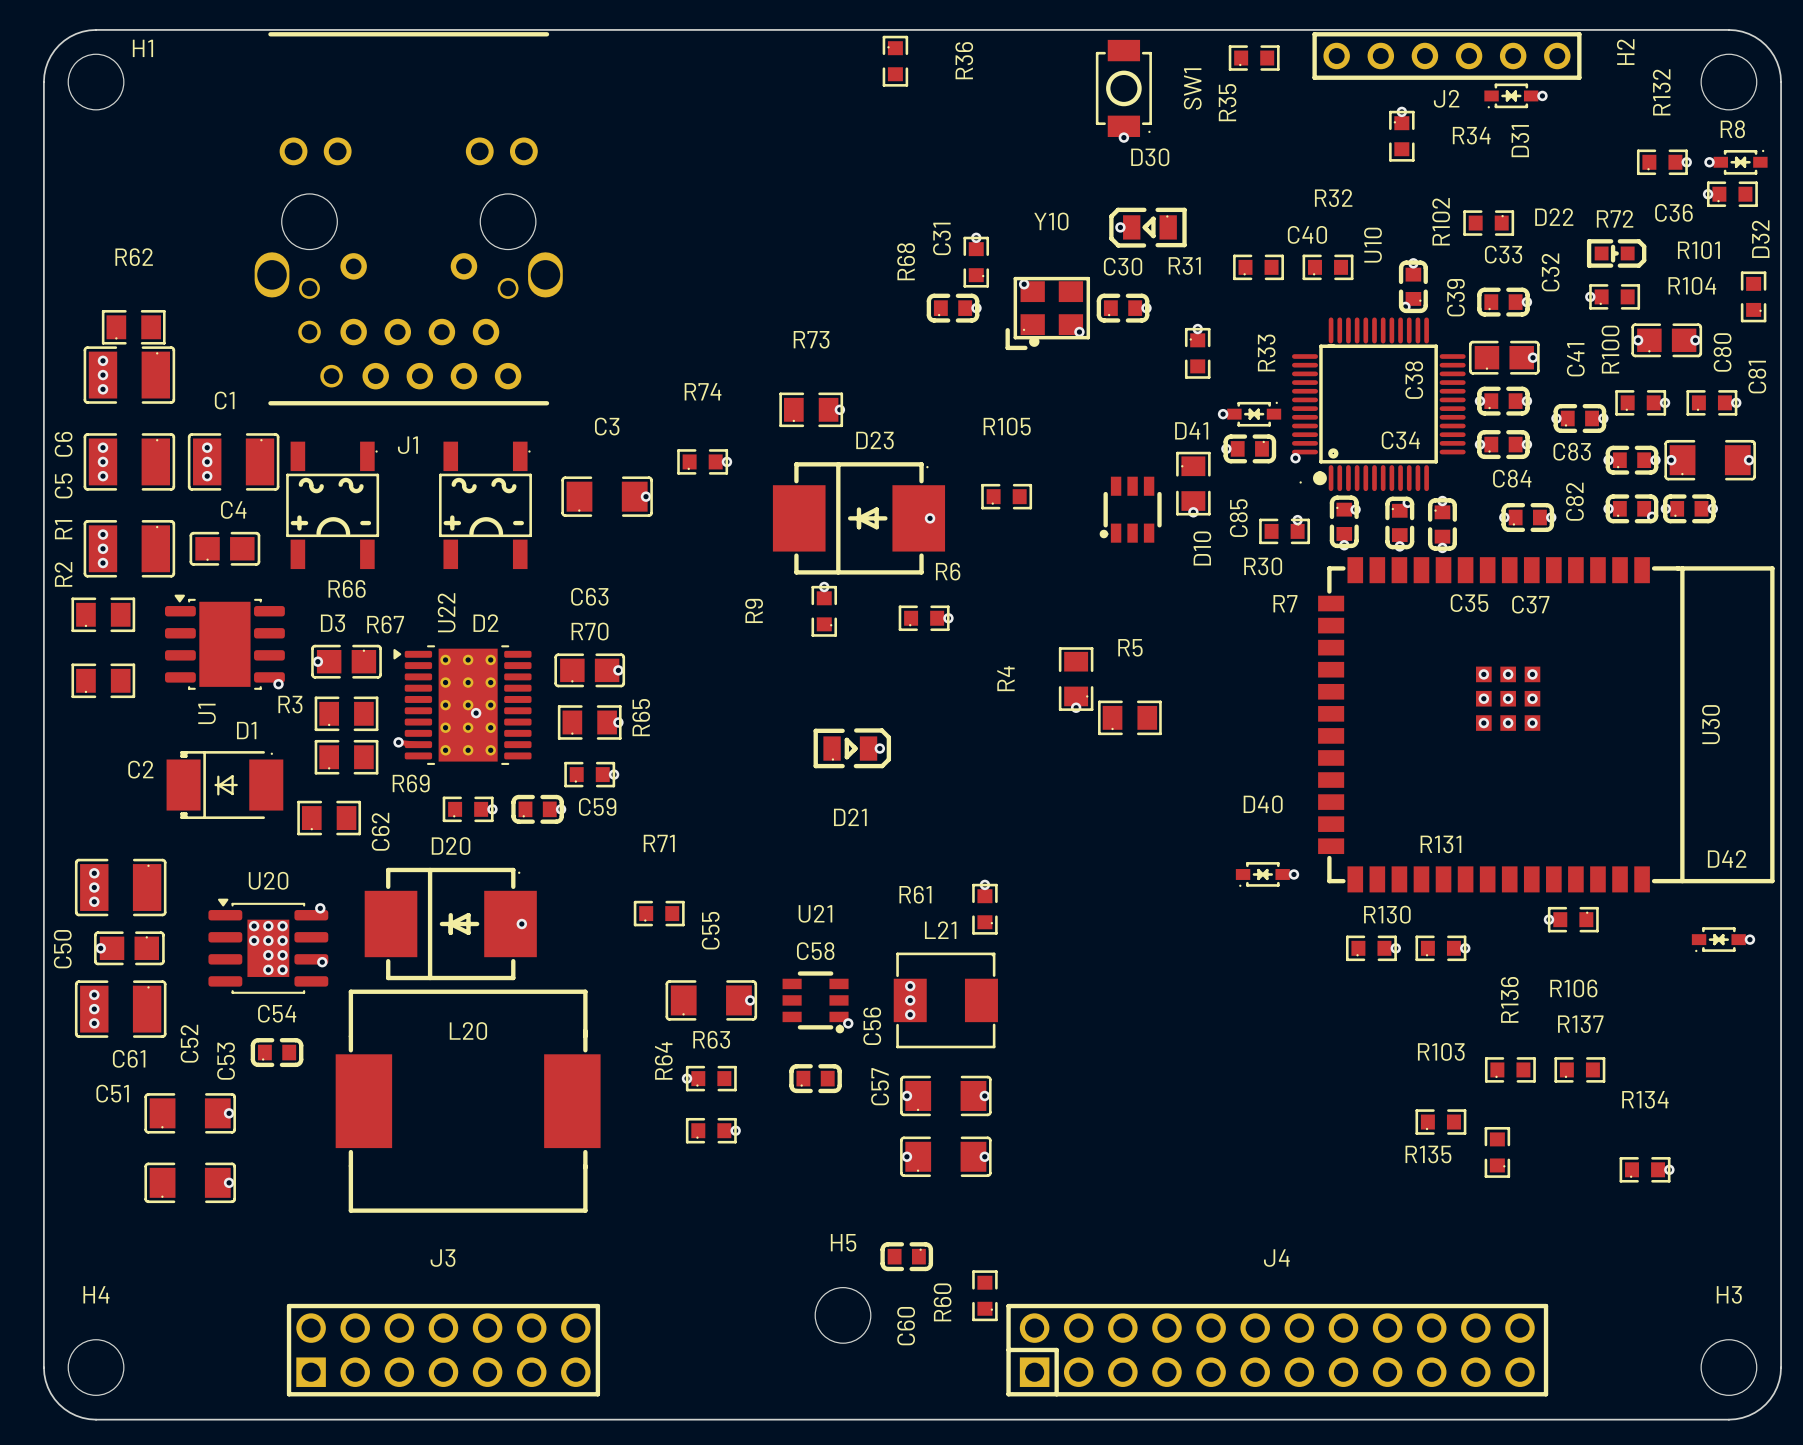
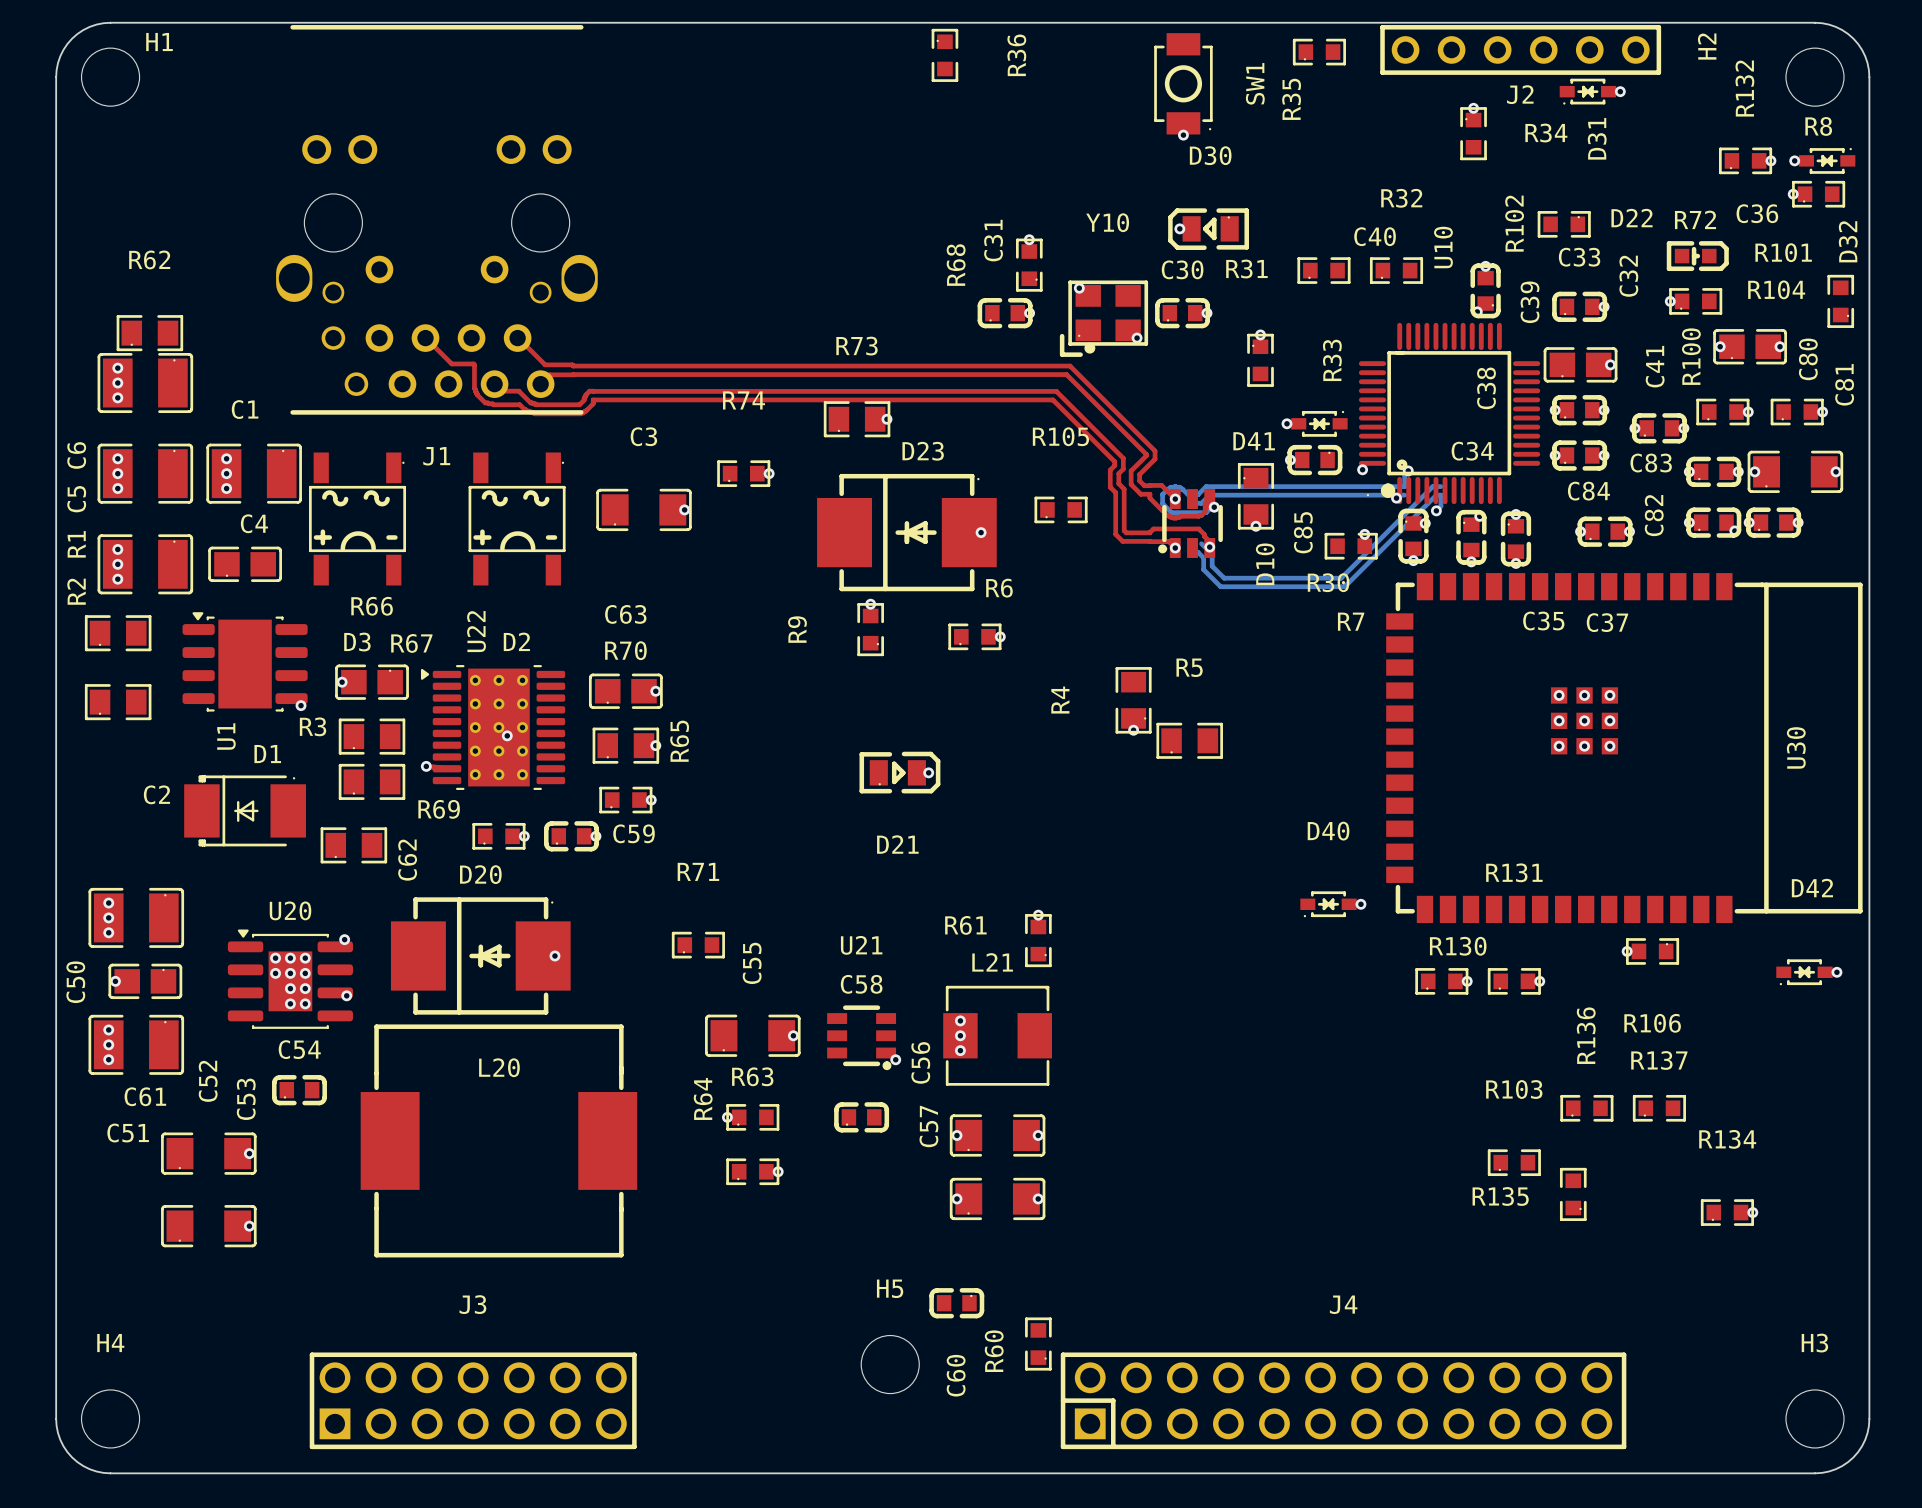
top track: none -> (425, 337) (451, 363) (474, 364) (474, 388) (477, 394) (485, 402) (519, 404) (527, 411) (535, 413) (580, 413) (593, 403) (593, 399) (1052, 399) (1114, 461) (1114, 465) (1110, 470) (1110, 487) (1115, 492) (1115, 534) (1122, 541) (1149, 541)
top track: none -> (517, 337) (545, 364) (573, 365)
top track: none -> (573, 366) (1070, 366) (1155, 451) (1155, 459) (1139, 474) (1139, 480) (1144, 485) (1149, 485)
top track: none -> (573, 374) (1066, 374) (1146, 454) (1131, 470) (1131, 484) (1140, 494) (1149, 494) (1149, 498) (1167, 515) (1173, 518) (1201, 515) (1205, 511) (1205, 503) (1209, 499) (1209, 502) (1214, 507) (1211, 507)
top track: none -> (573, 374) (549, 374) (540, 383)
top track: none -> (494, 383) (501, 391) (518, 391) (530, 402) (536, 404) (579, 404) (585, 394) (589, 391) (593, 391)
top track: none -> (593, 391) (1056, 391) (1123, 458) (1123, 469) (1118, 473) (1118, 483) (1124, 489) (1124, 530) (1126, 532) (1149, 532)
bottom track: none -> (1408, 470) (1404, 474) (1404, 486) (1206, 486) (1198, 494) (1192, 494)
via: none -> (1408, 470)
top track: none -> (1149, 485) (1161, 485) (1175, 499)
bottom track: none -> (1440, 486) (1432, 486) (1341, 578) (1224, 578) (1212, 566) (1212, 554) (1201, 543)
bottom track: none -> (1192, 494) (1187, 494) (1179, 487) (1170, 487) (1162, 494) (1162, 503) (1171, 512) (1206, 512) (1211, 507)
bottom track: none -> (1404, 495) (1209, 495) (1201, 503) (1192, 503)
via: none -> (1396, 498)
via: none -> (1175, 499)
via: none -> (1214, 507)
bottom track: none -> (1436, 510) (1440, 506) (1440, 495) (1436, 495) (1344, 586) (1220, 586) (1203, 569) (1203, 557) (1198, 552) (1192, 552)
via: none -> (1436, 510)
top track: none -> (1149, 532) (1153, 528) (1198, 528) (1209, 541) (1209, 548)
top track: none -> (1149, 541) (1168, 541) (1175, 548)
via: none -> (1209, 547)
via: none -> (1175, 548)

